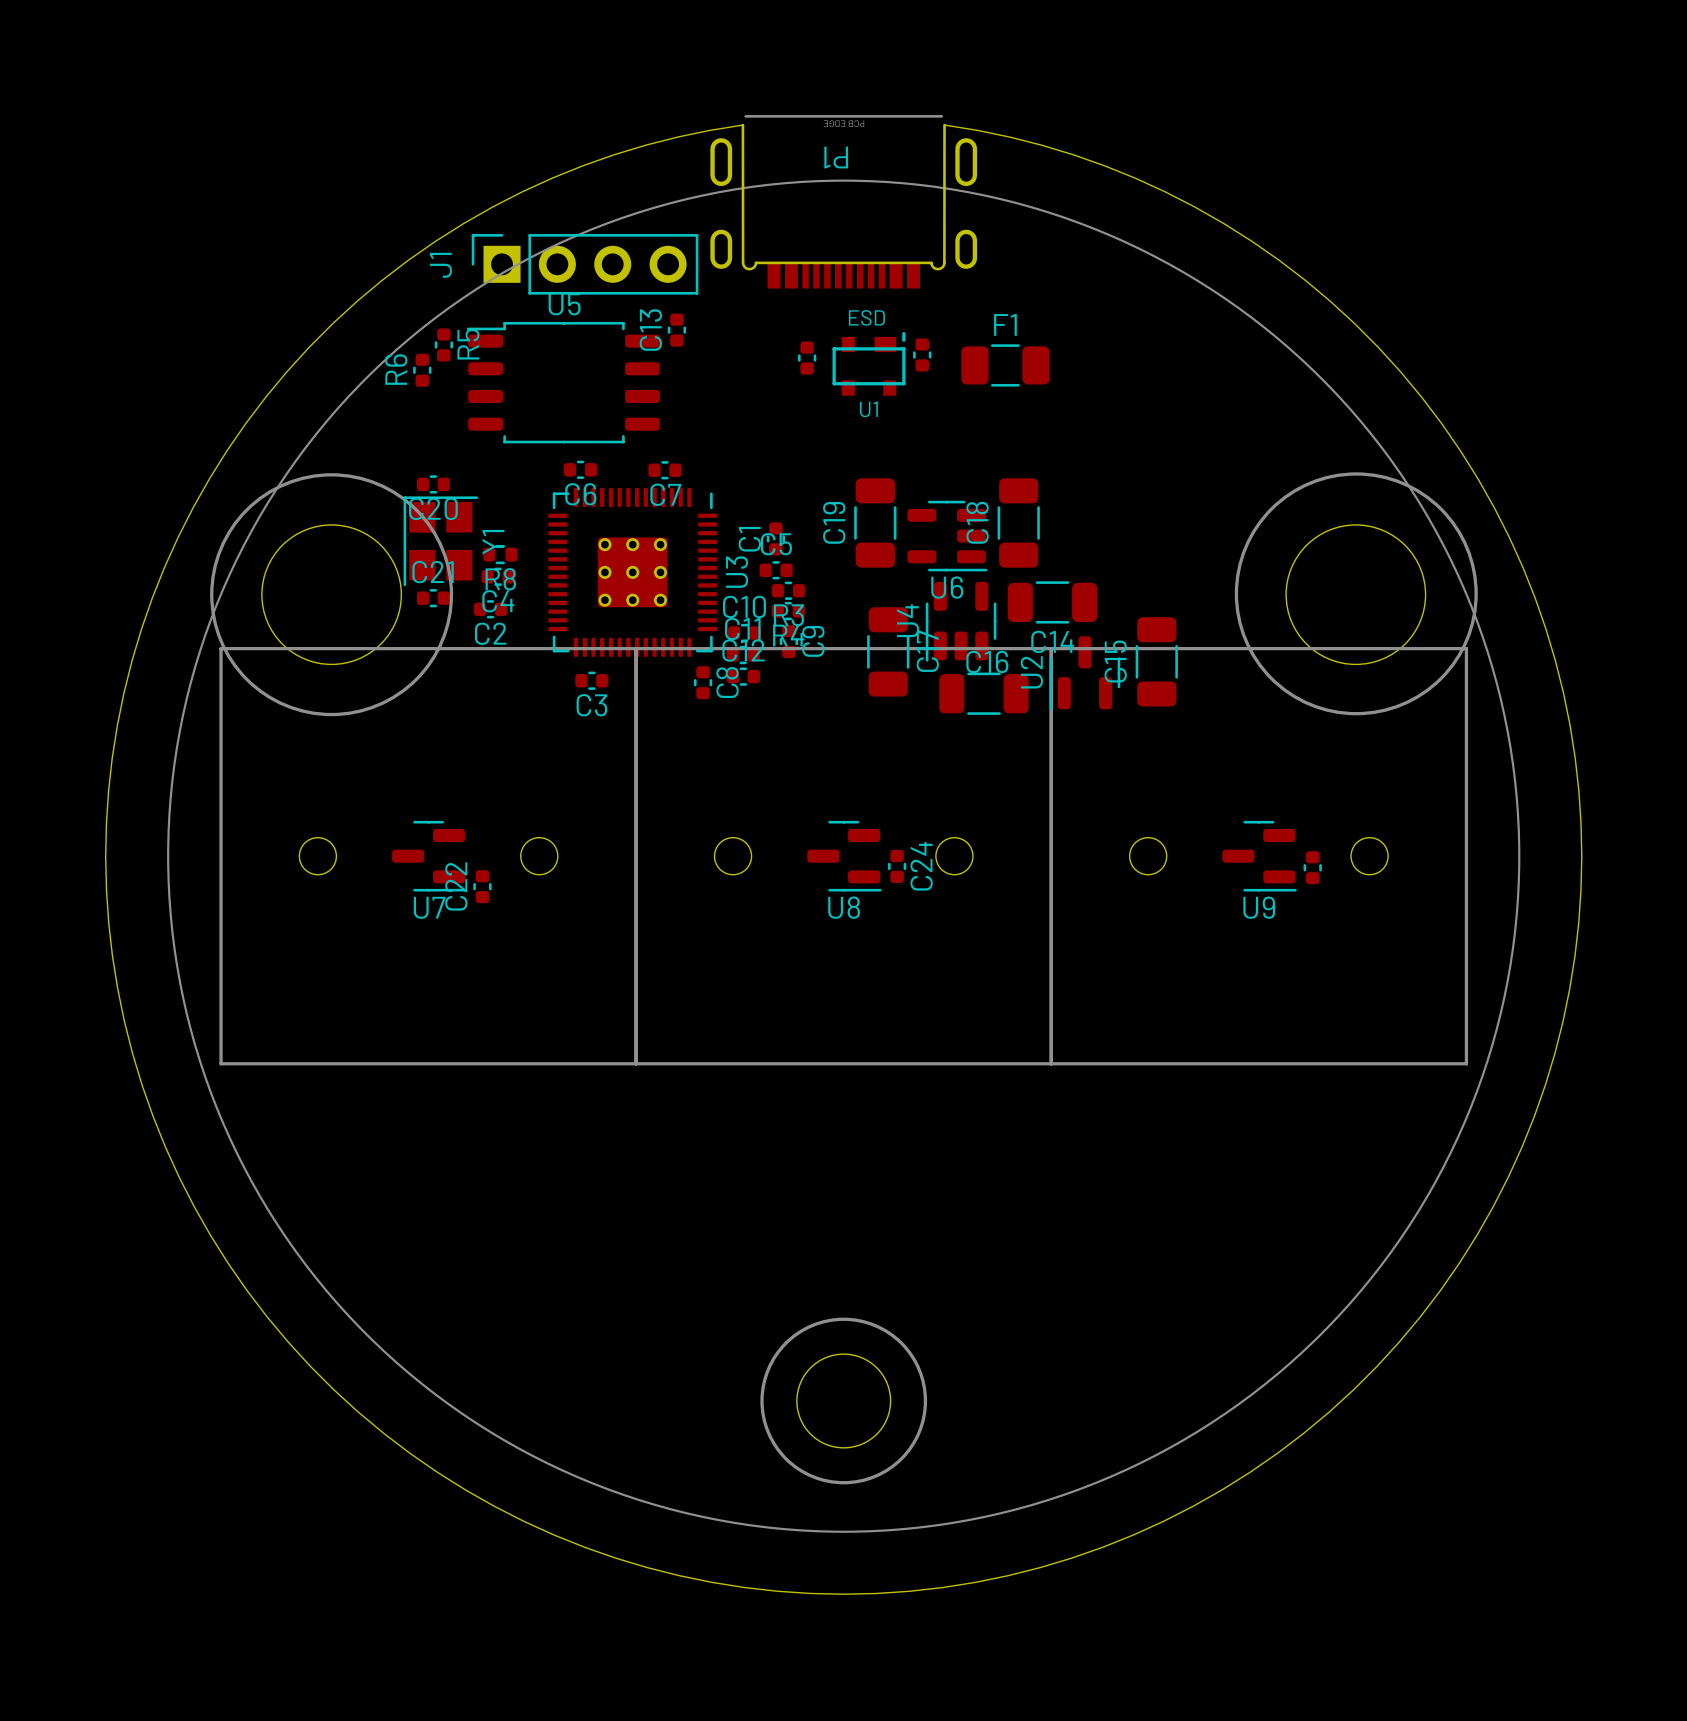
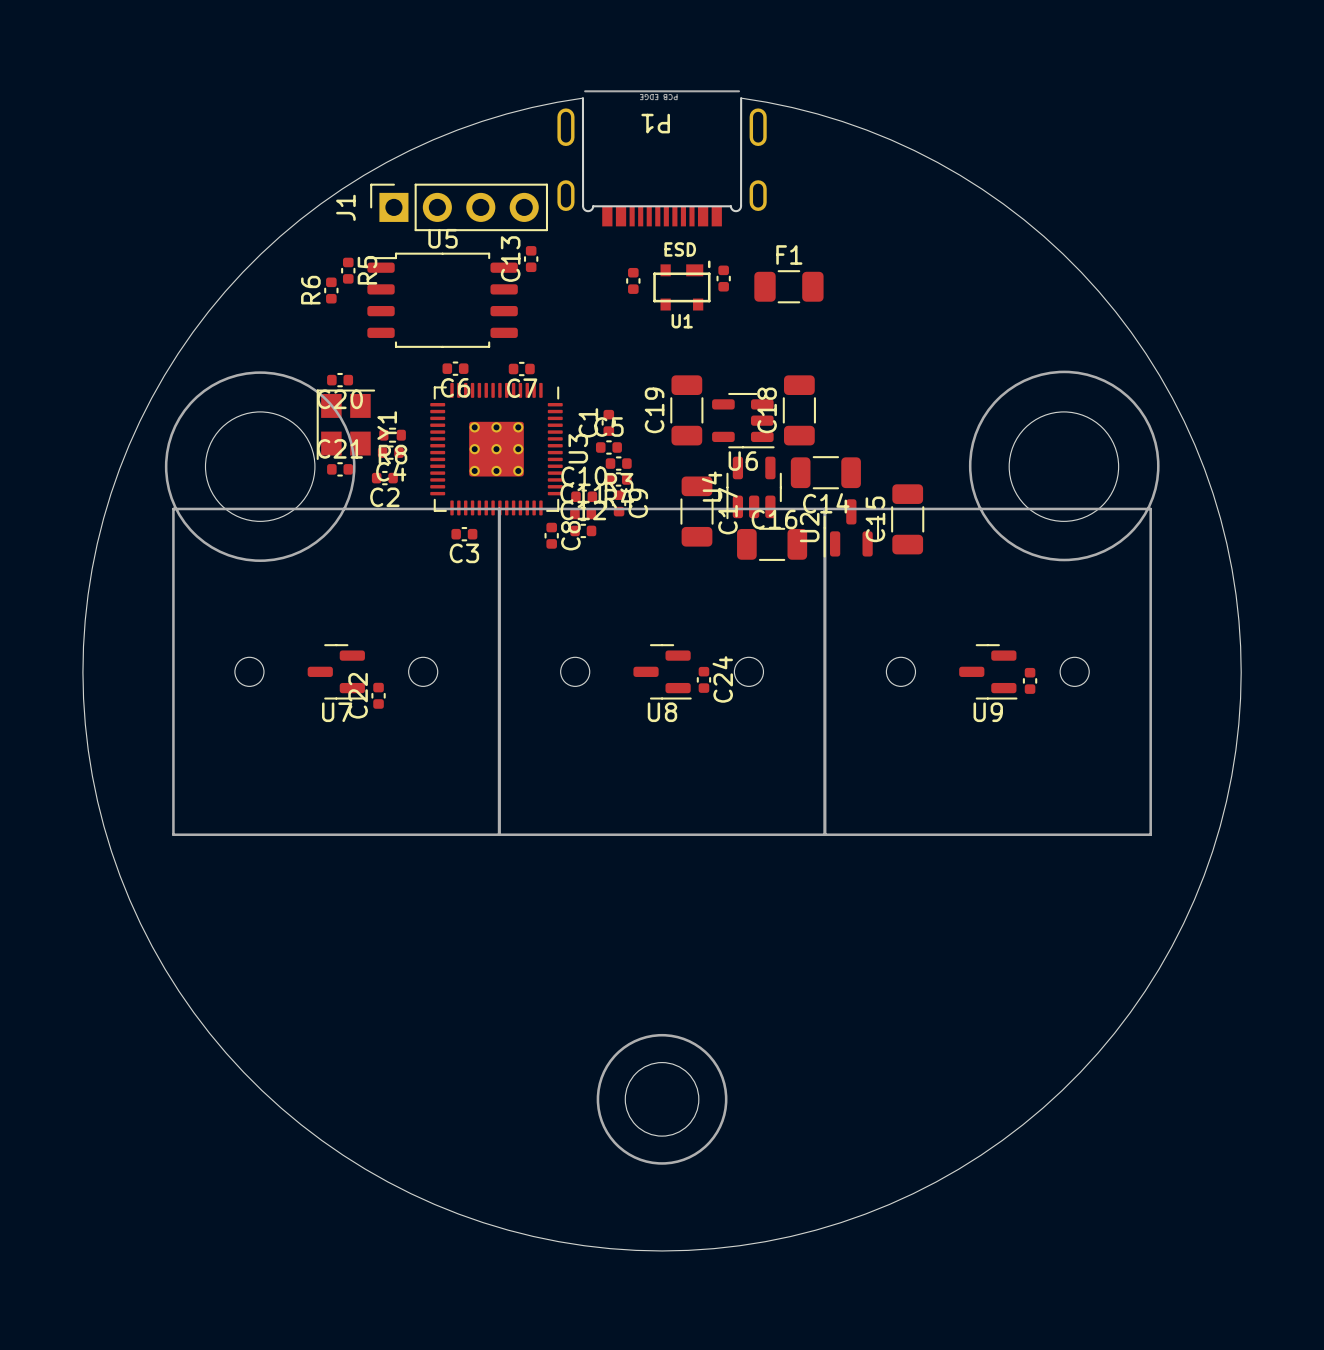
drawing: [167, 179, 1521, 1533] -> none

